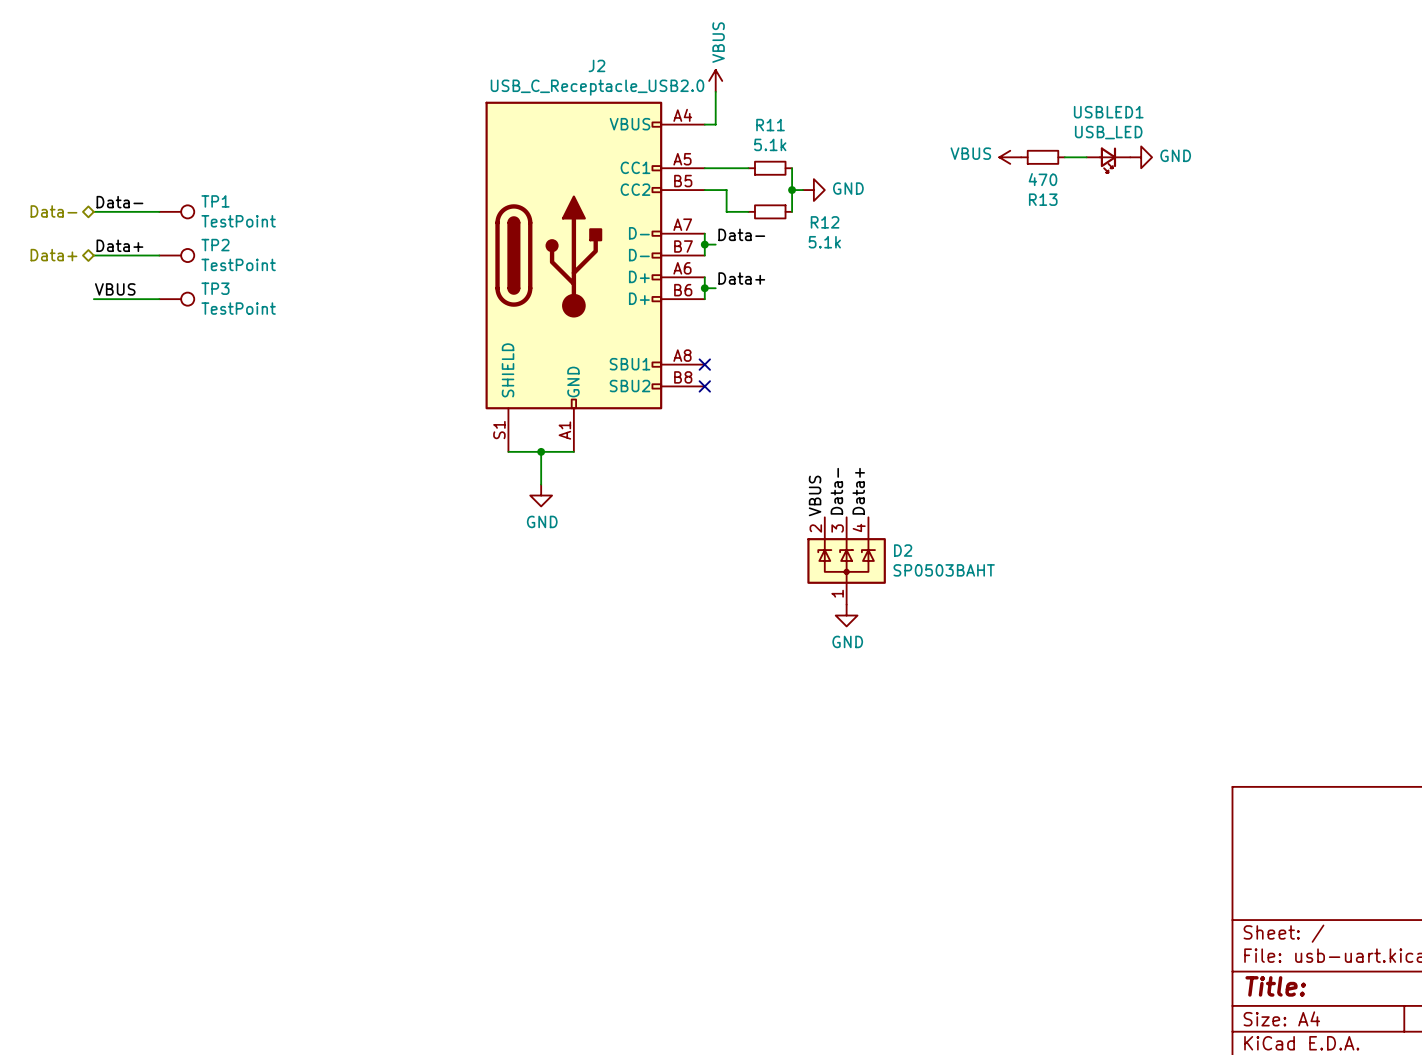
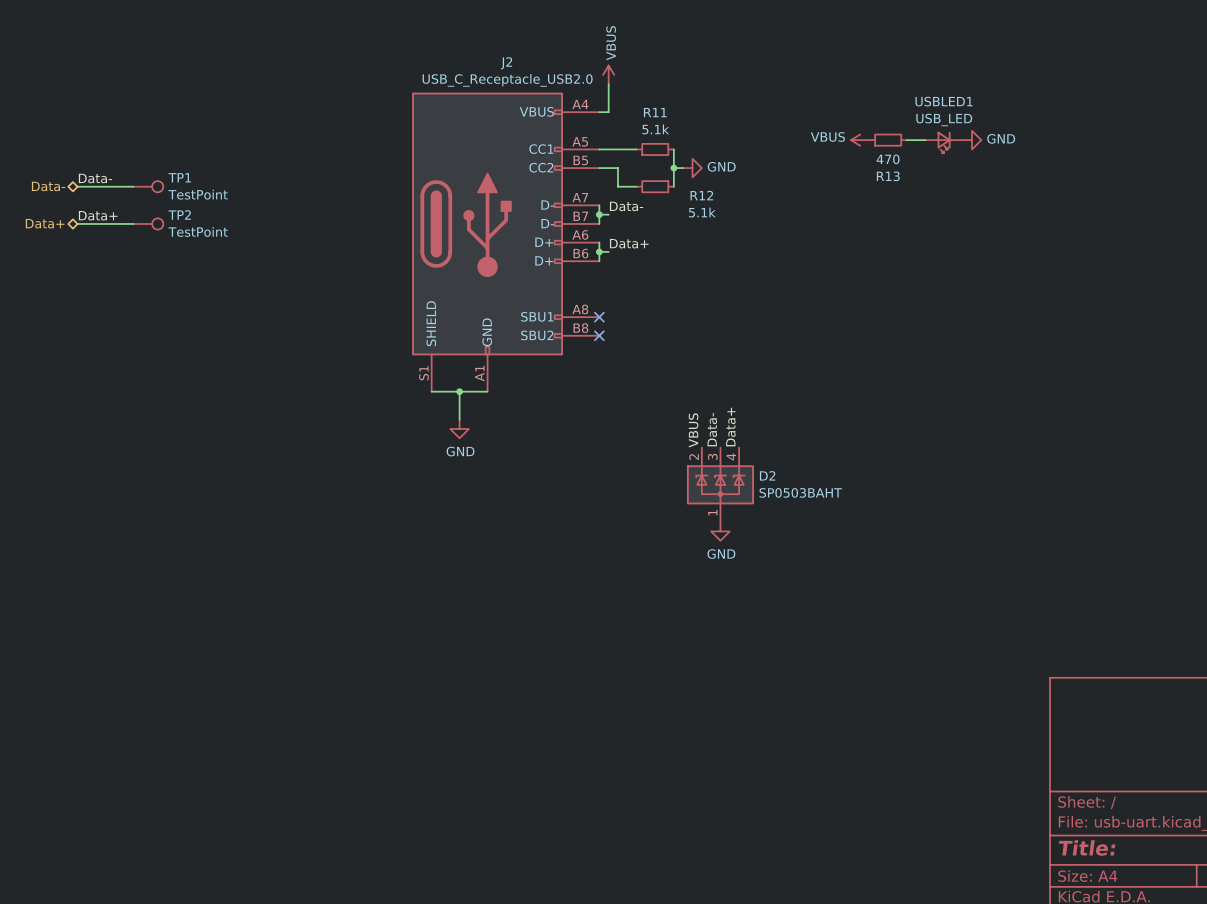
label: VBUS (115, 289) -> none
wire: (93, 299) (159, 299) -> none
TP3: TestPoint (176, 299) -> none

